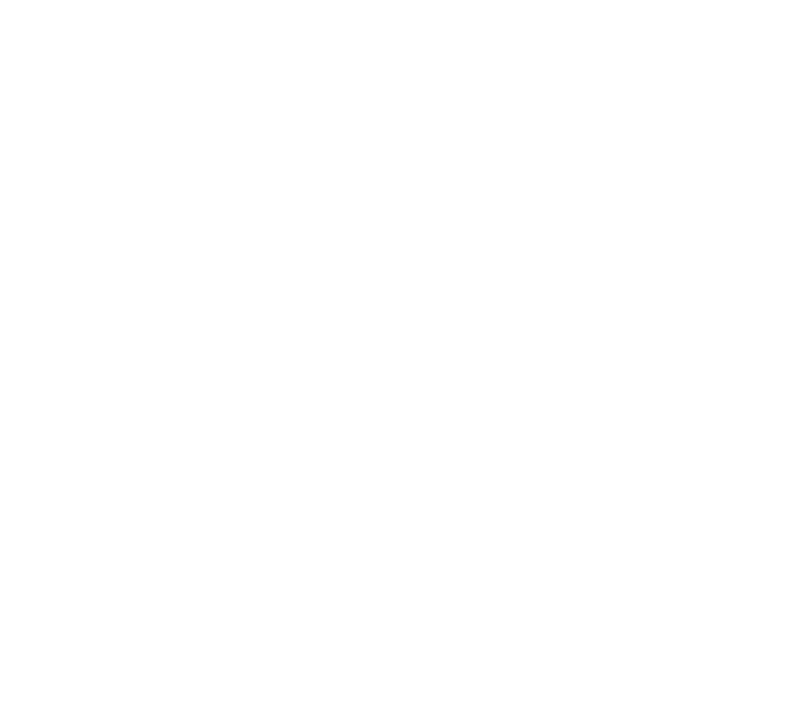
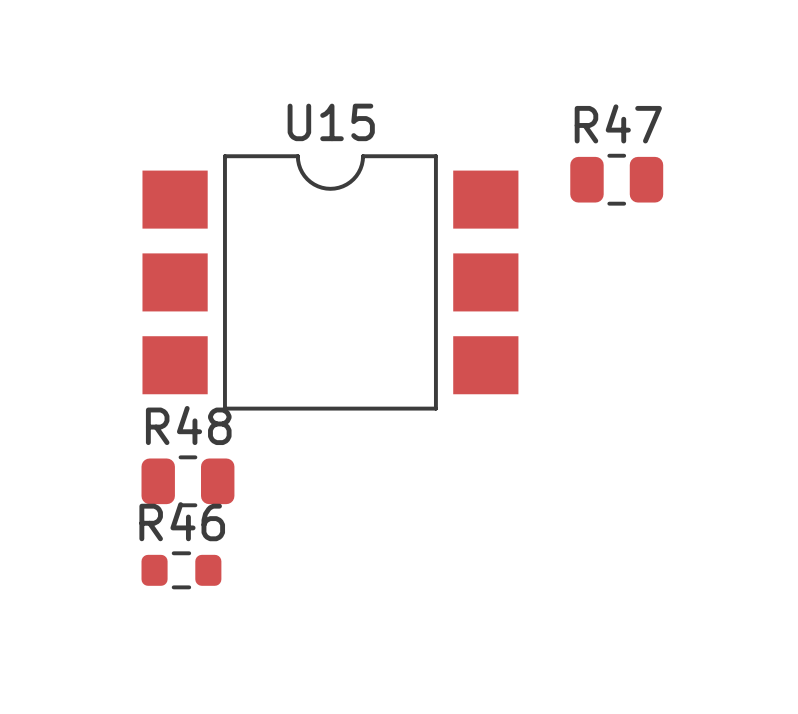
R47: none -> (616, 179)
U15: none -> (330, 282)
R48: none -> (187, 481)
R46: none -> (181, 570)

